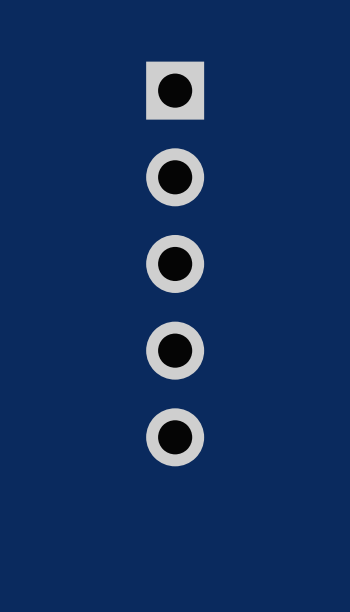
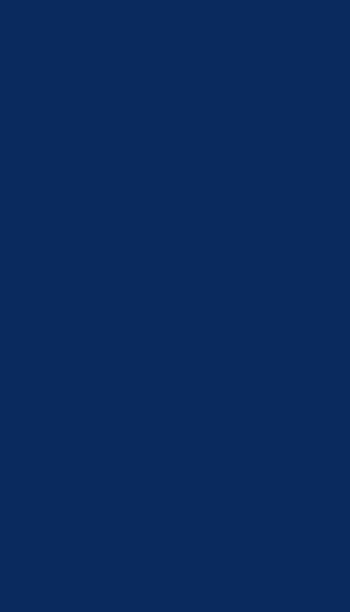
part: (175, 263) -> none

